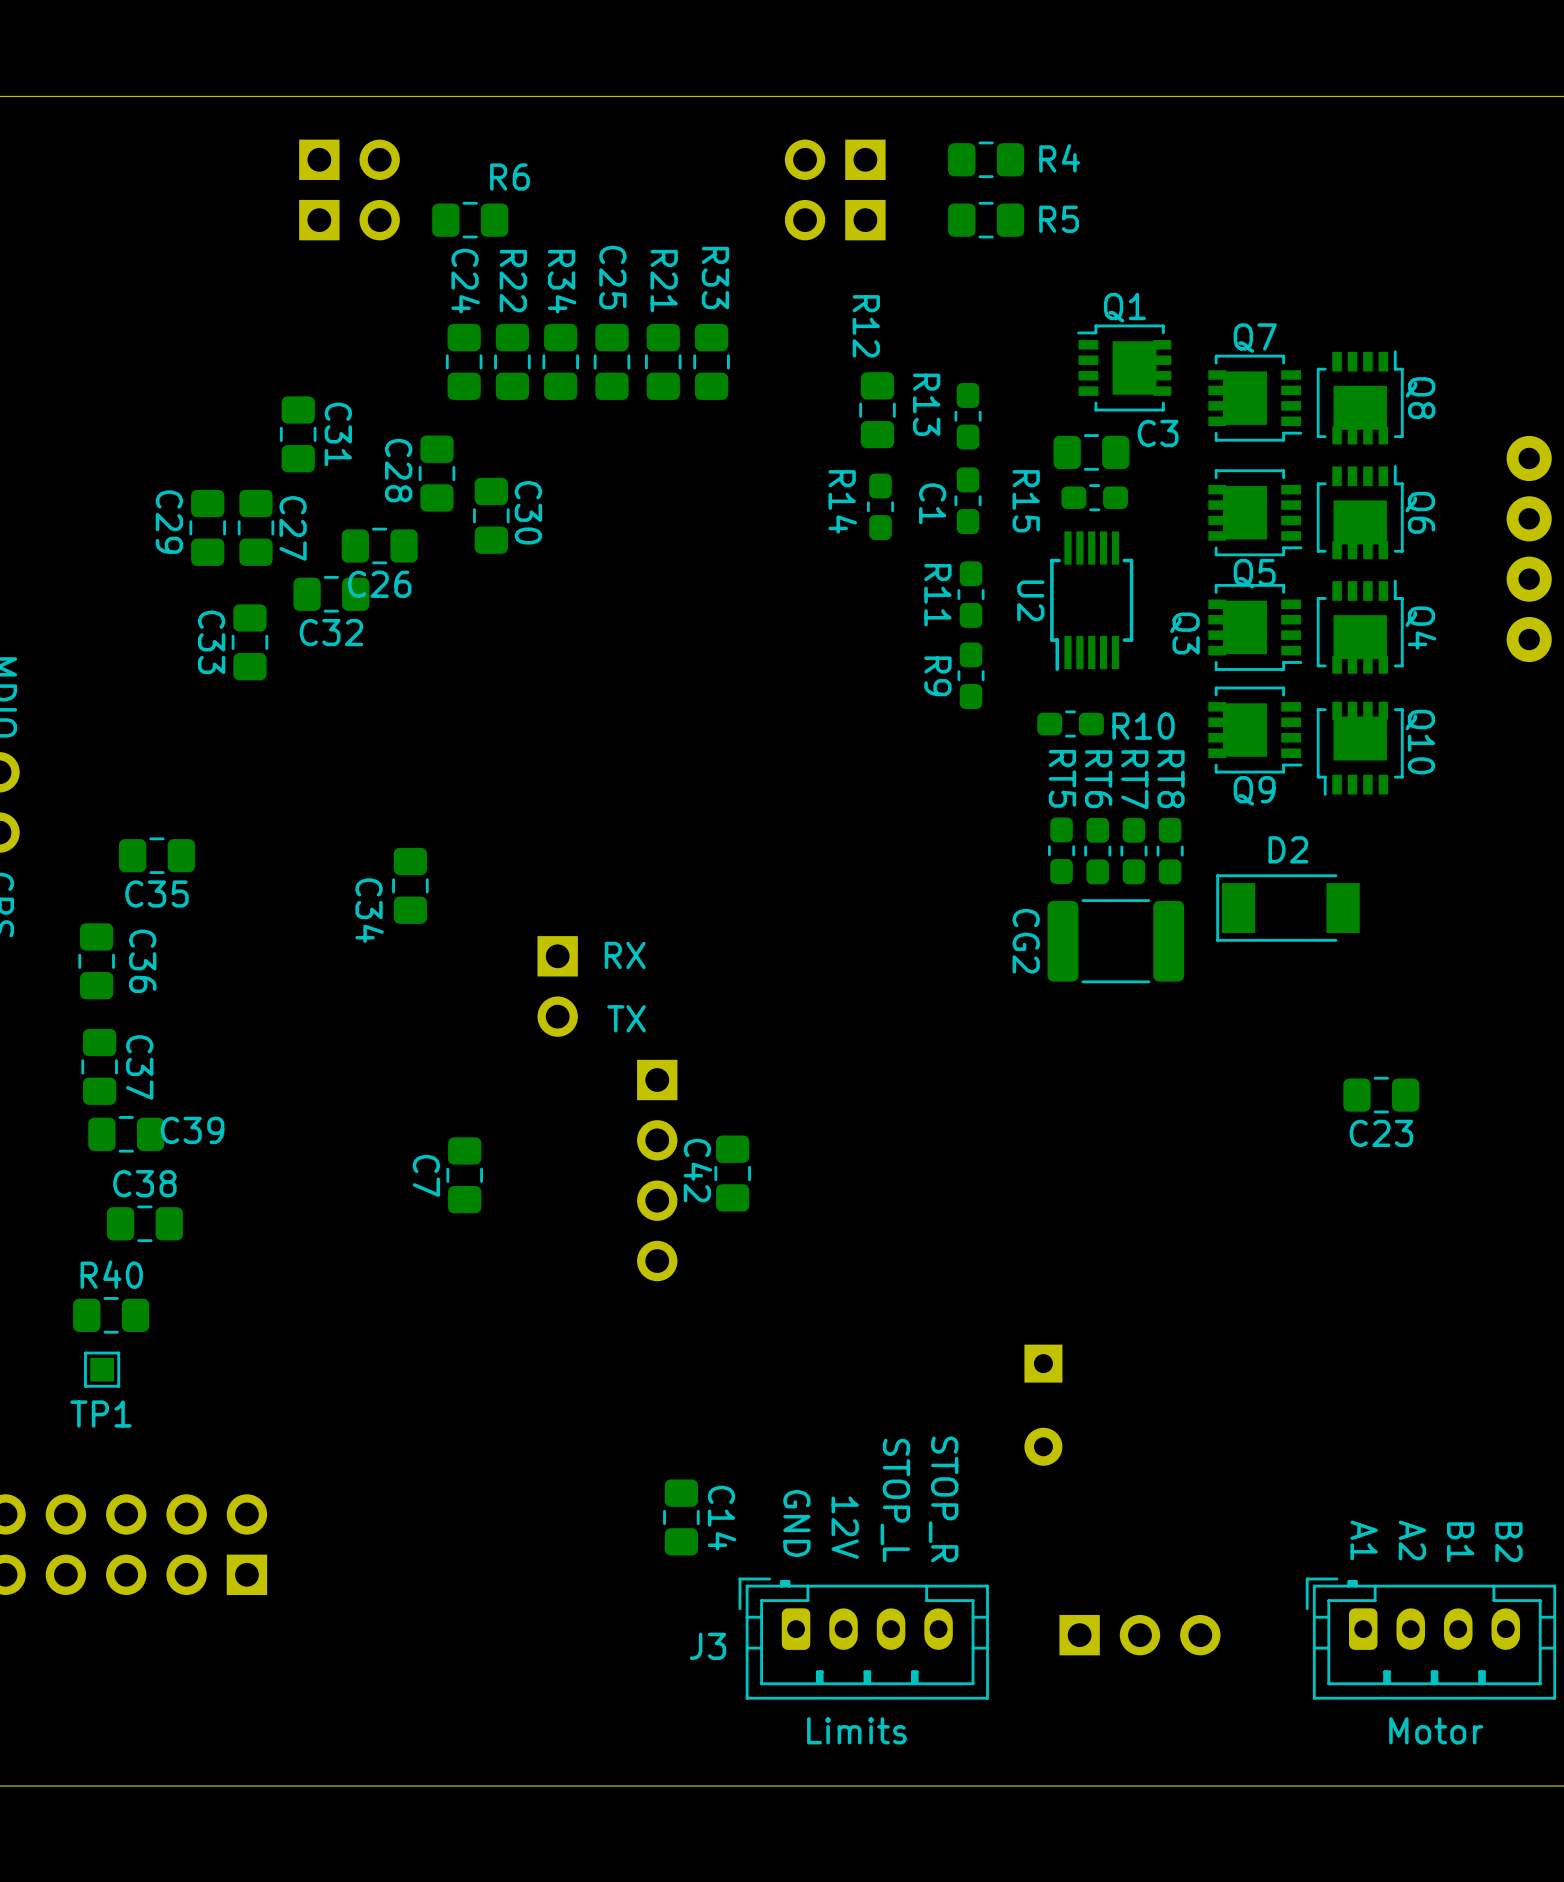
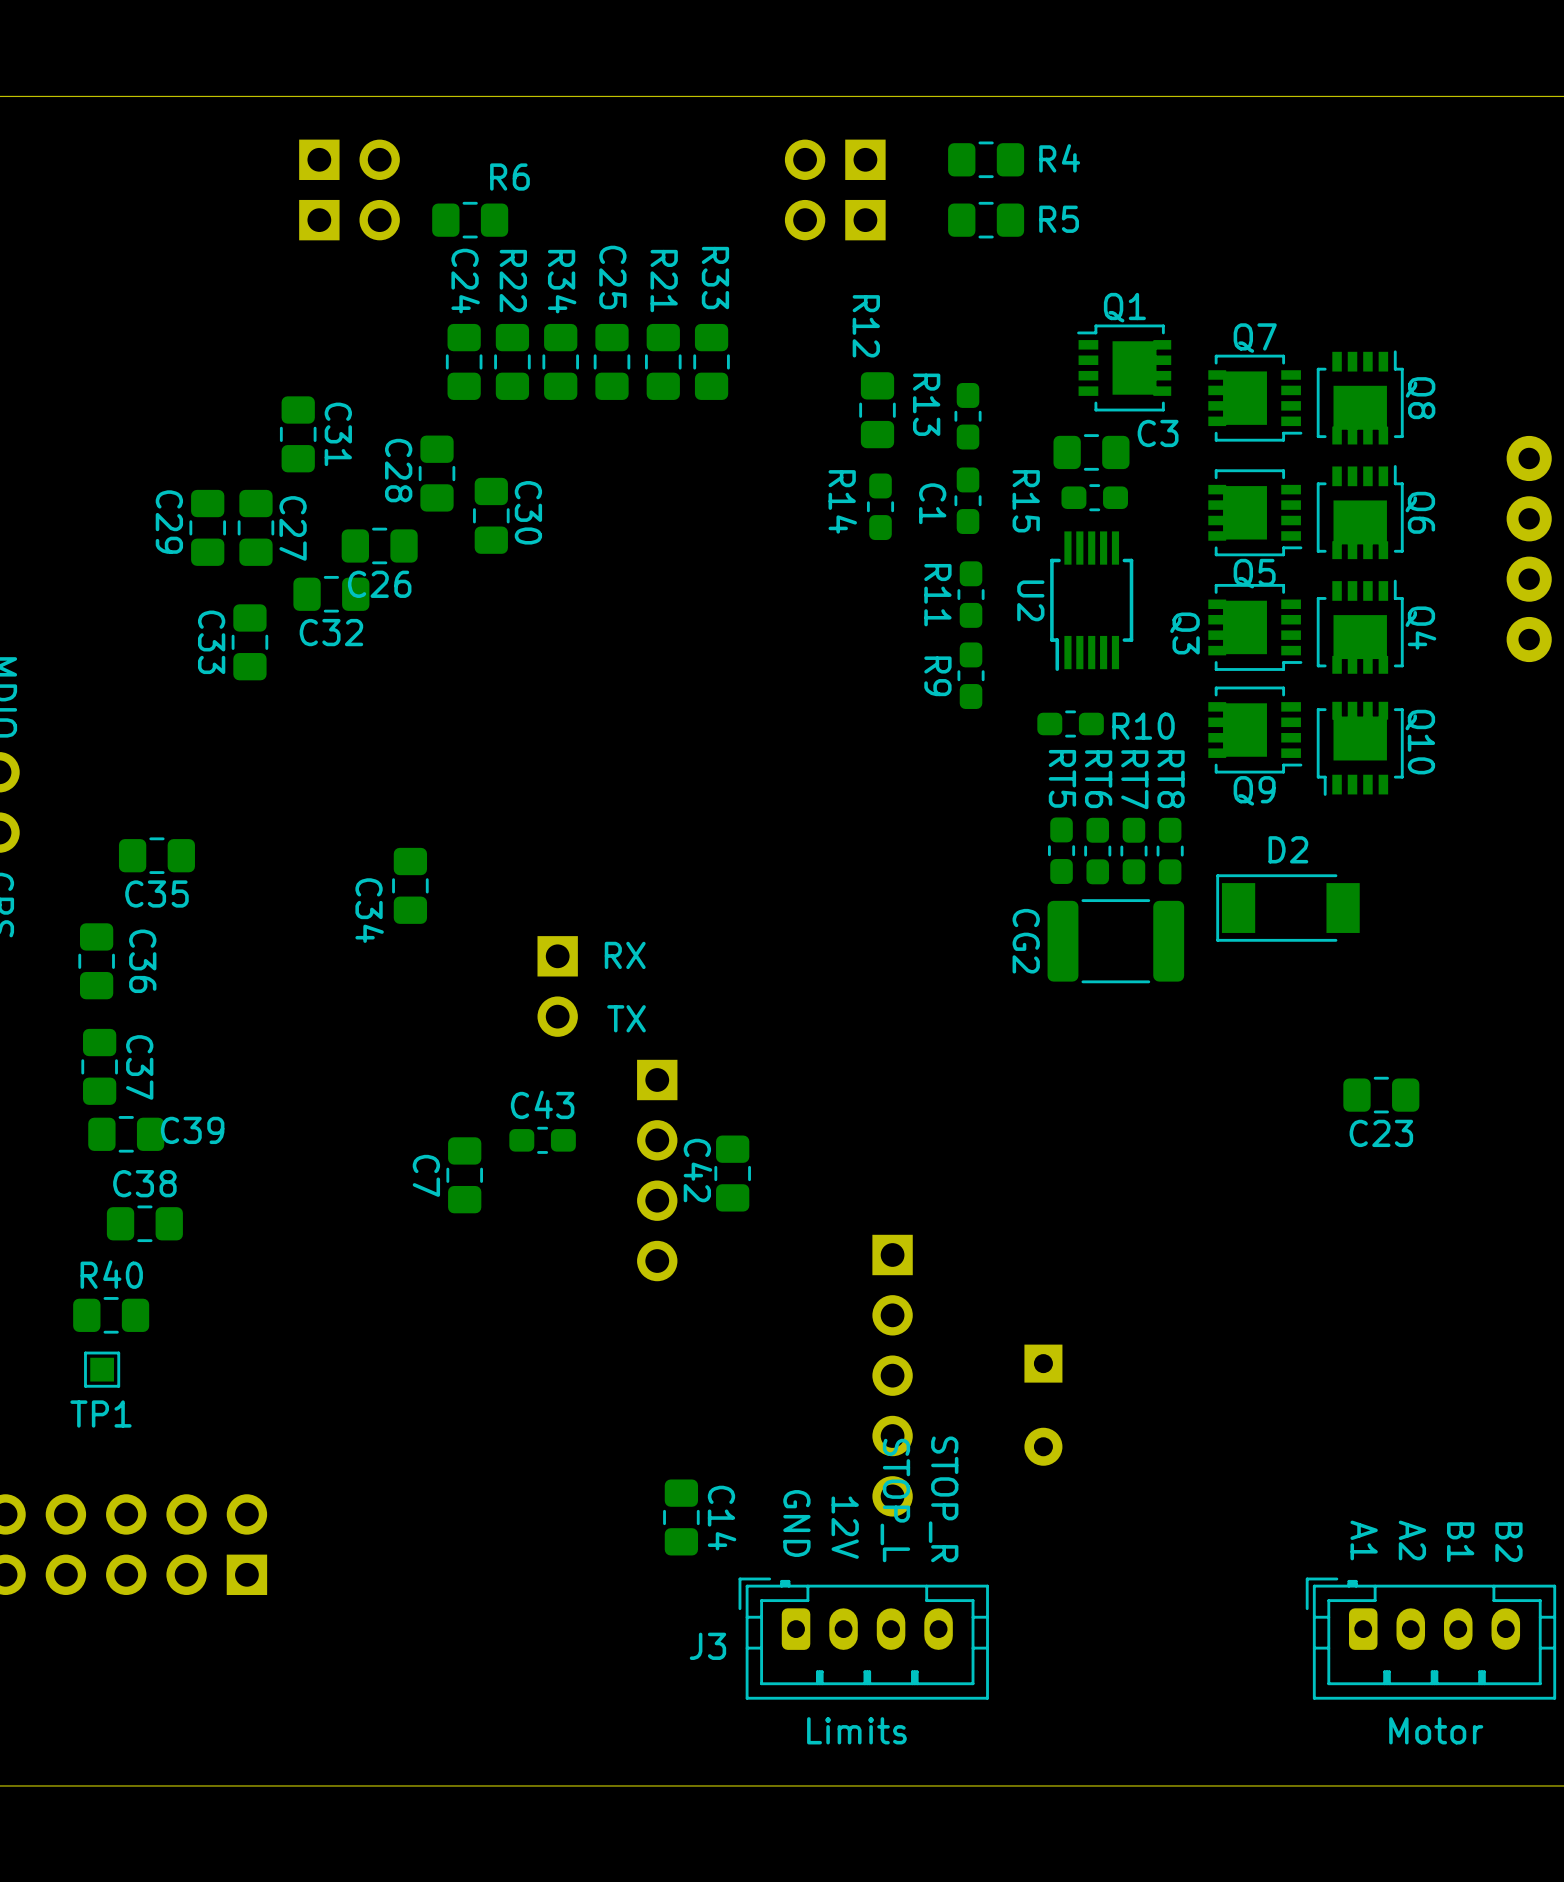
C43: none -> (542, 1140)
part: none -> (892, 1375)
part: (1139, 1635) -> none

